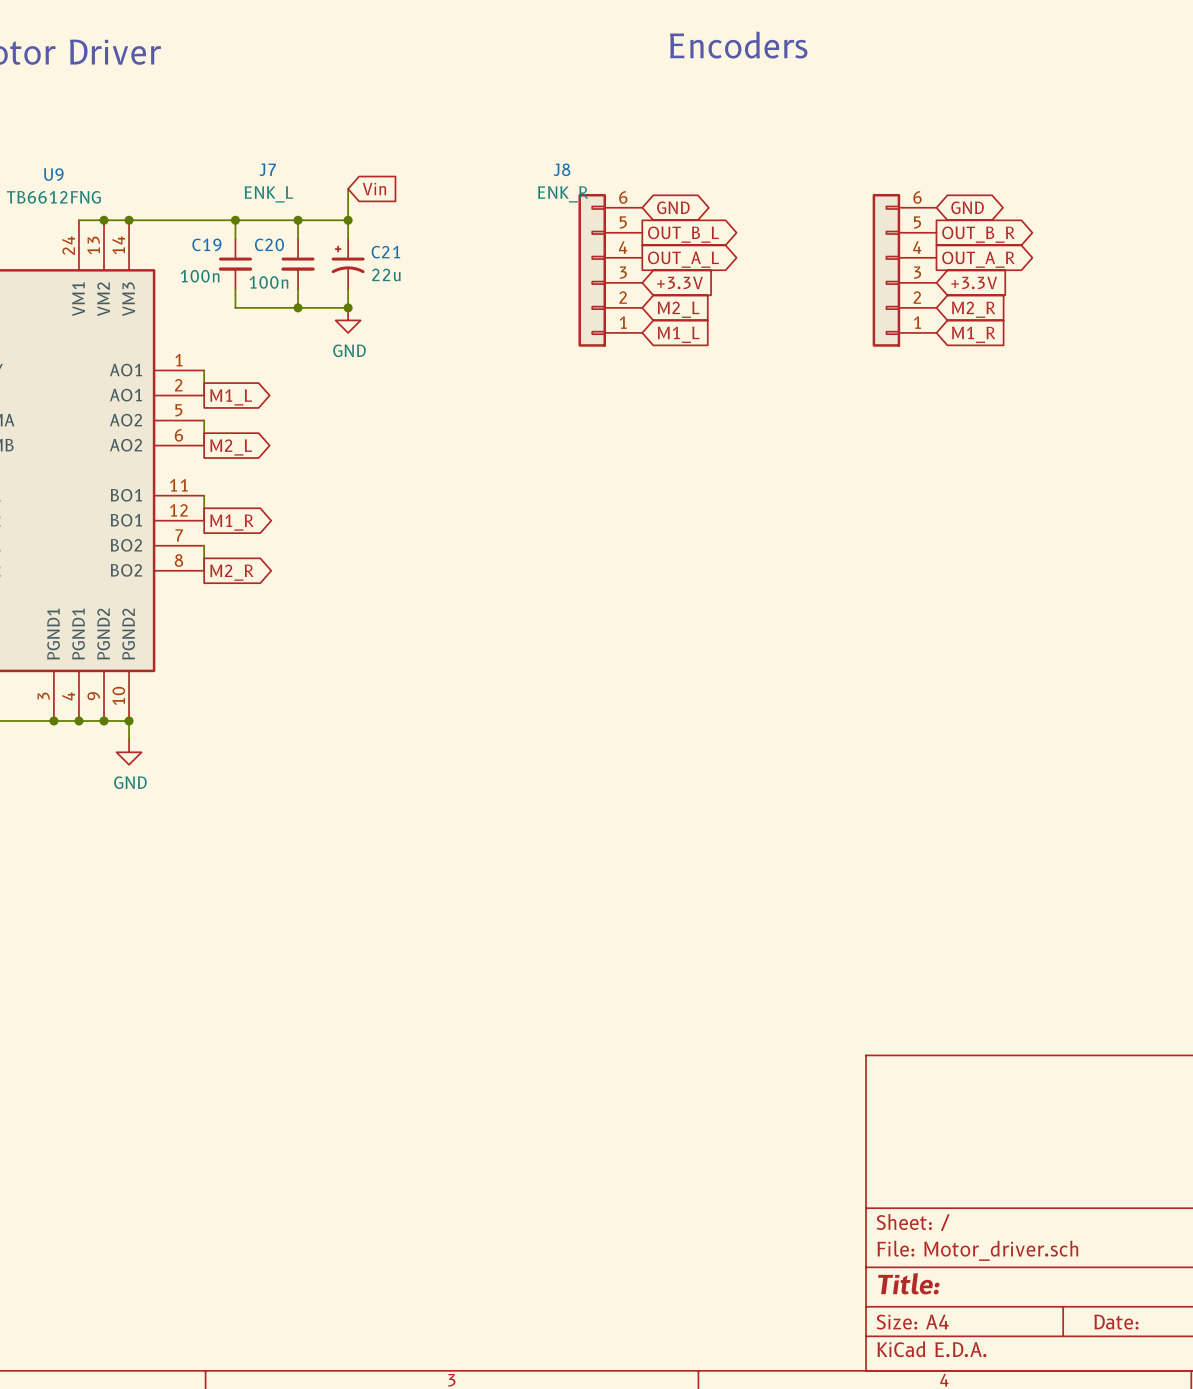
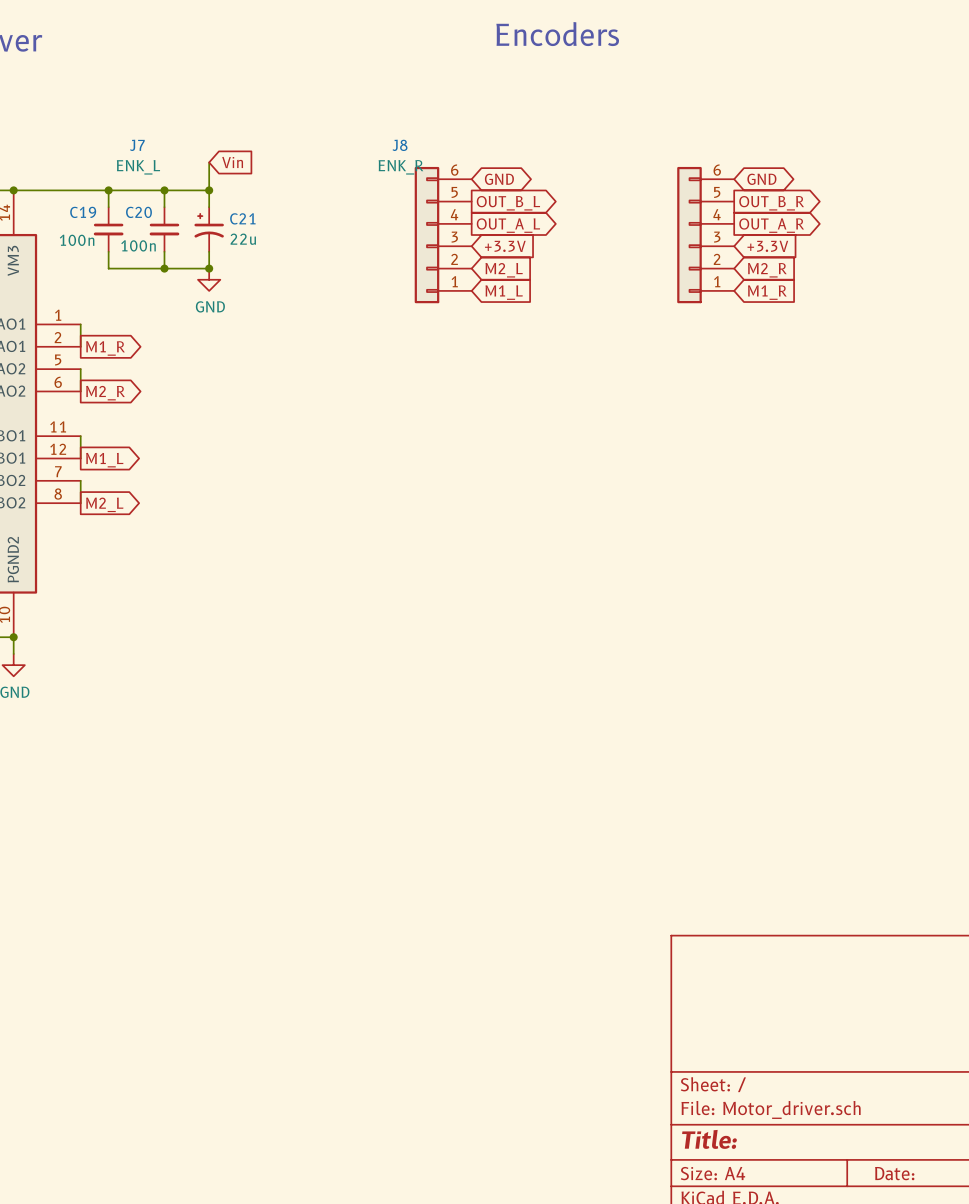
global label: M1_L (231, 397) -> M1_R (105, 348)
global label: M2_L (231, 447) -> M2_R (105, 393)
global label: M1_R (231, 522) -> M1_L (104, 460)
global label: M2_R (231, 572) -> M2_L (104, 504)

